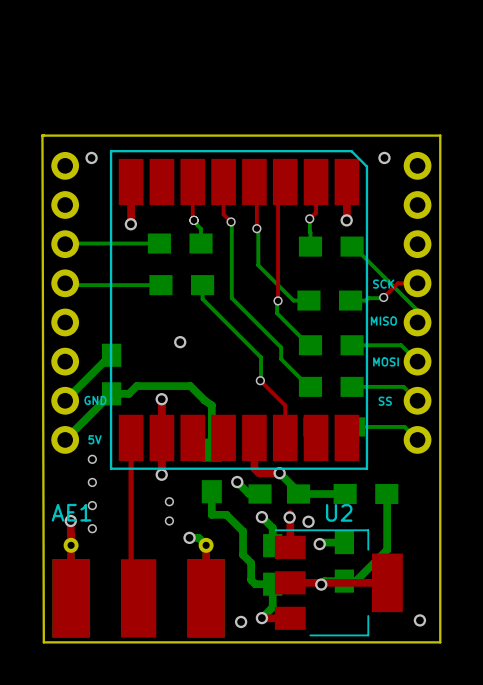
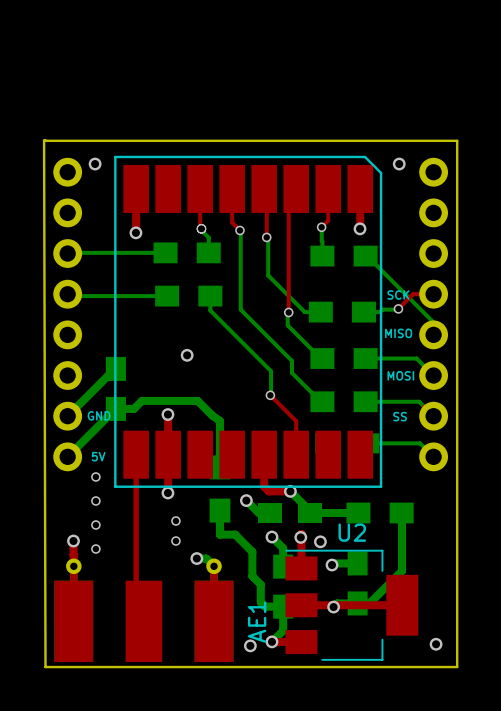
AE1 name rotation: 0° (71, 512) -> 90° counterclockwise (257, 622)
AE1 name position: AE1 (71, 512) -> AE1 (257, 622)

